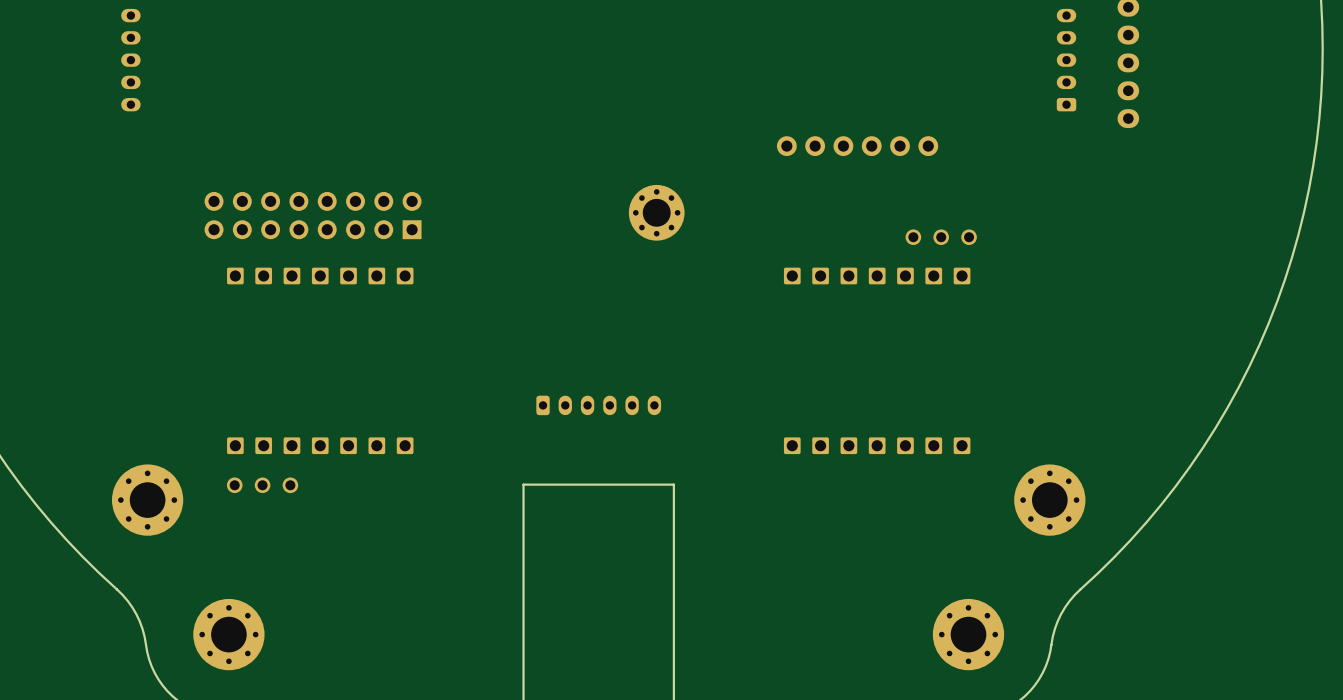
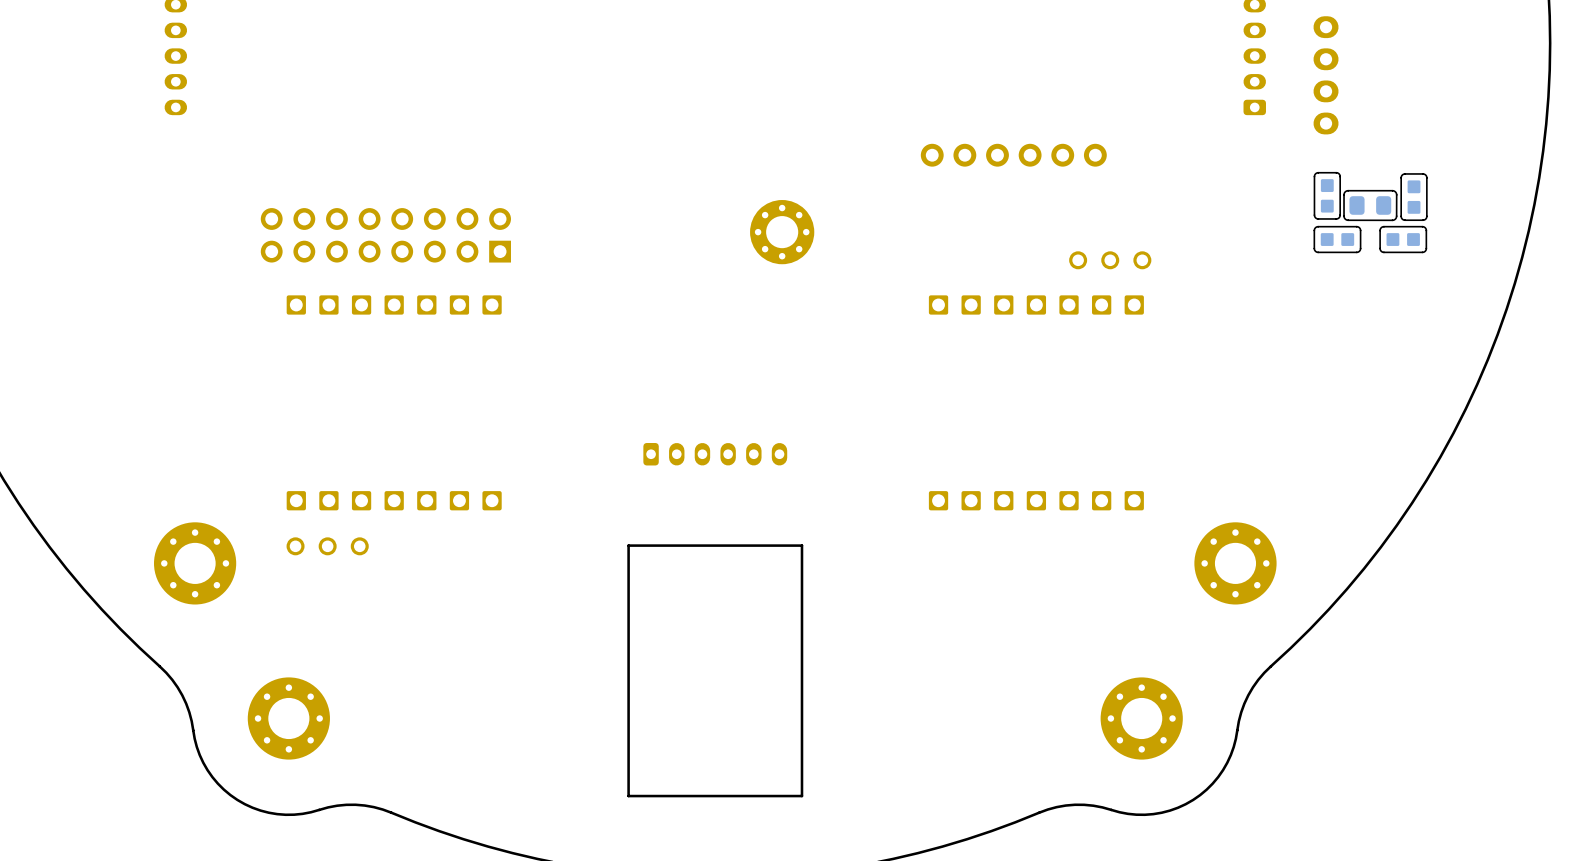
part: none -> (1327, 195)
part: none -> (1414, 197)
part: none -> (1370, 205)
part: none -> (1337, 239)
part: none -> (1403, 239)

